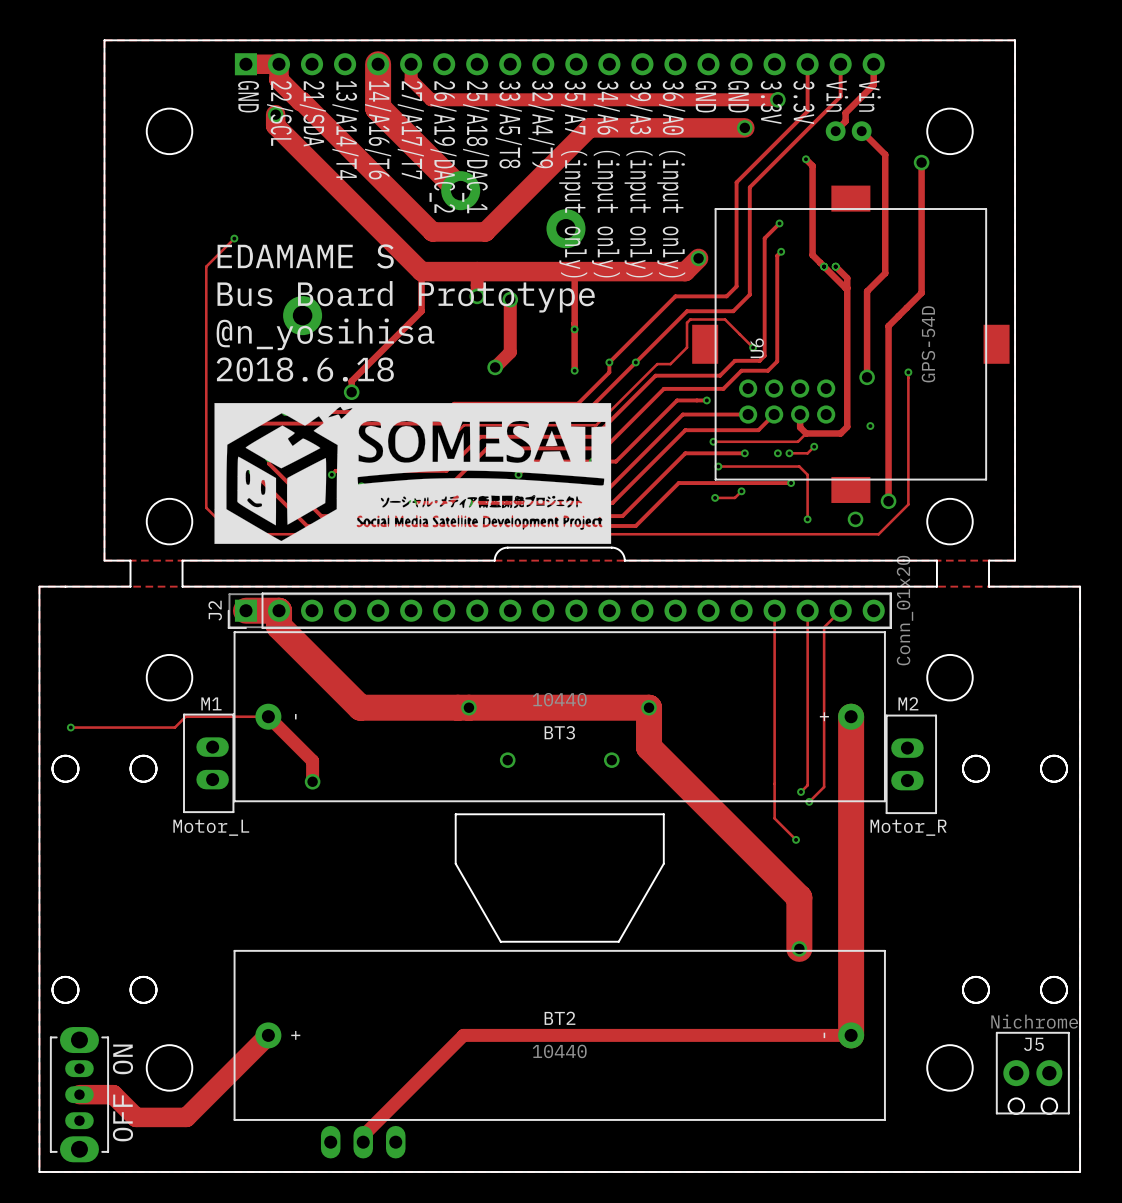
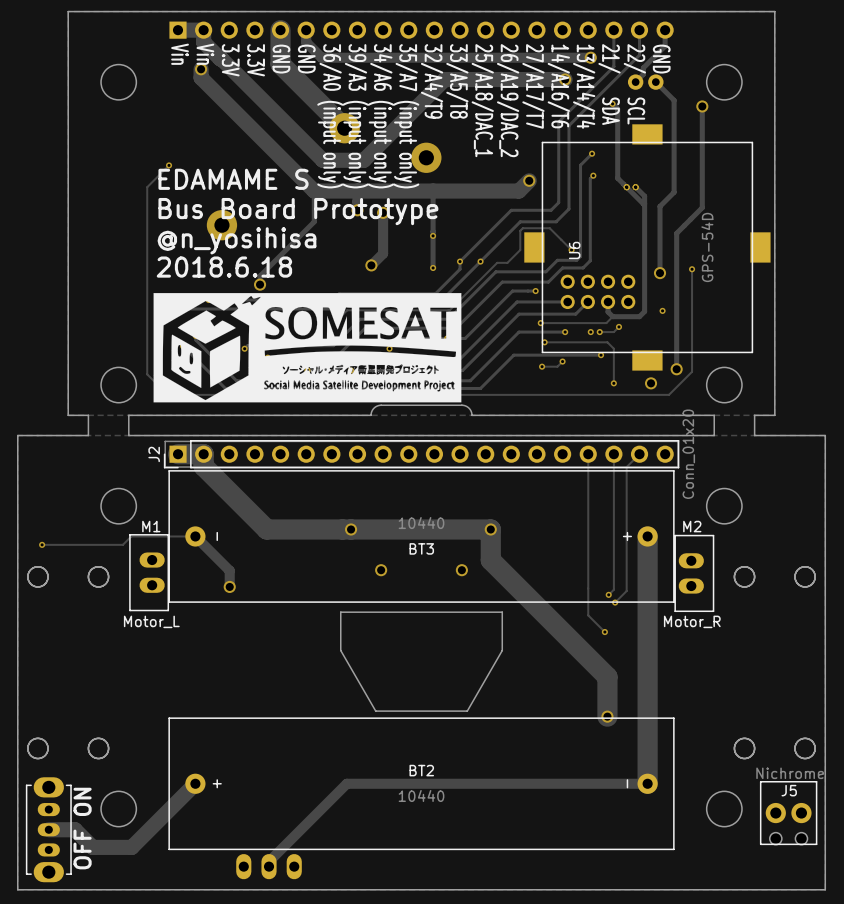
text: GND (248, 96) -> Vin (180, 54)
text: GND (705, 96) -> 27/A17/T7 (533, 86)
text: GND (738, 96) -> 14/A16/T6 (558, 86)
text: Vin (837, 96) -> 22/ SCL (634, 84)
text: Vin (870, 96) -> GND (661, 59)
text: 3.3V (771, 102) -> 13/A14/T4 (584, 86)
text: 3.3V (803, 102) -> 21/ SDA (609, 84)
text: 22/SCL (280, 113) -> Vin (205, 54)
text: 21/SDA (312, 113) -> 3.3V (230, 60)
text: 33/A5/T8 (508, 124) -> 34/A6 (input only) (380, 116)
text: 32/A4/T9 (541, 124) -> 35/A7 (input only) (406, 116)
text: 13/A14/T4 (345, 130) -> 3.3V (256, 60)
text: 14/A16/T6 (378, 130) -> GND (281, 59)
text: 27/A17/T7 (410, 130) -> GND (306, 59)
text: 26/A19/DAC_2 (443, 147) -> 36/A0 (input only) (330, 116)
text: 25/A18/DAC_1 (475, 147) -> 39/A3 (input only) (355, 116)
text: 35/A7 (input only) (573, 179) -> 32/A4/T9 (432, 81)
text: 34/A6 (input only) (605, 179) -> 33/A5/T8 (457, 81)
text: 39/A3 (input only) (638, 179) -> 25/A18/DAC_1 (482, 100)
text: 36/A0 (input only) (671, 179) -> 26/A19/DAC_2 (508, 100)

